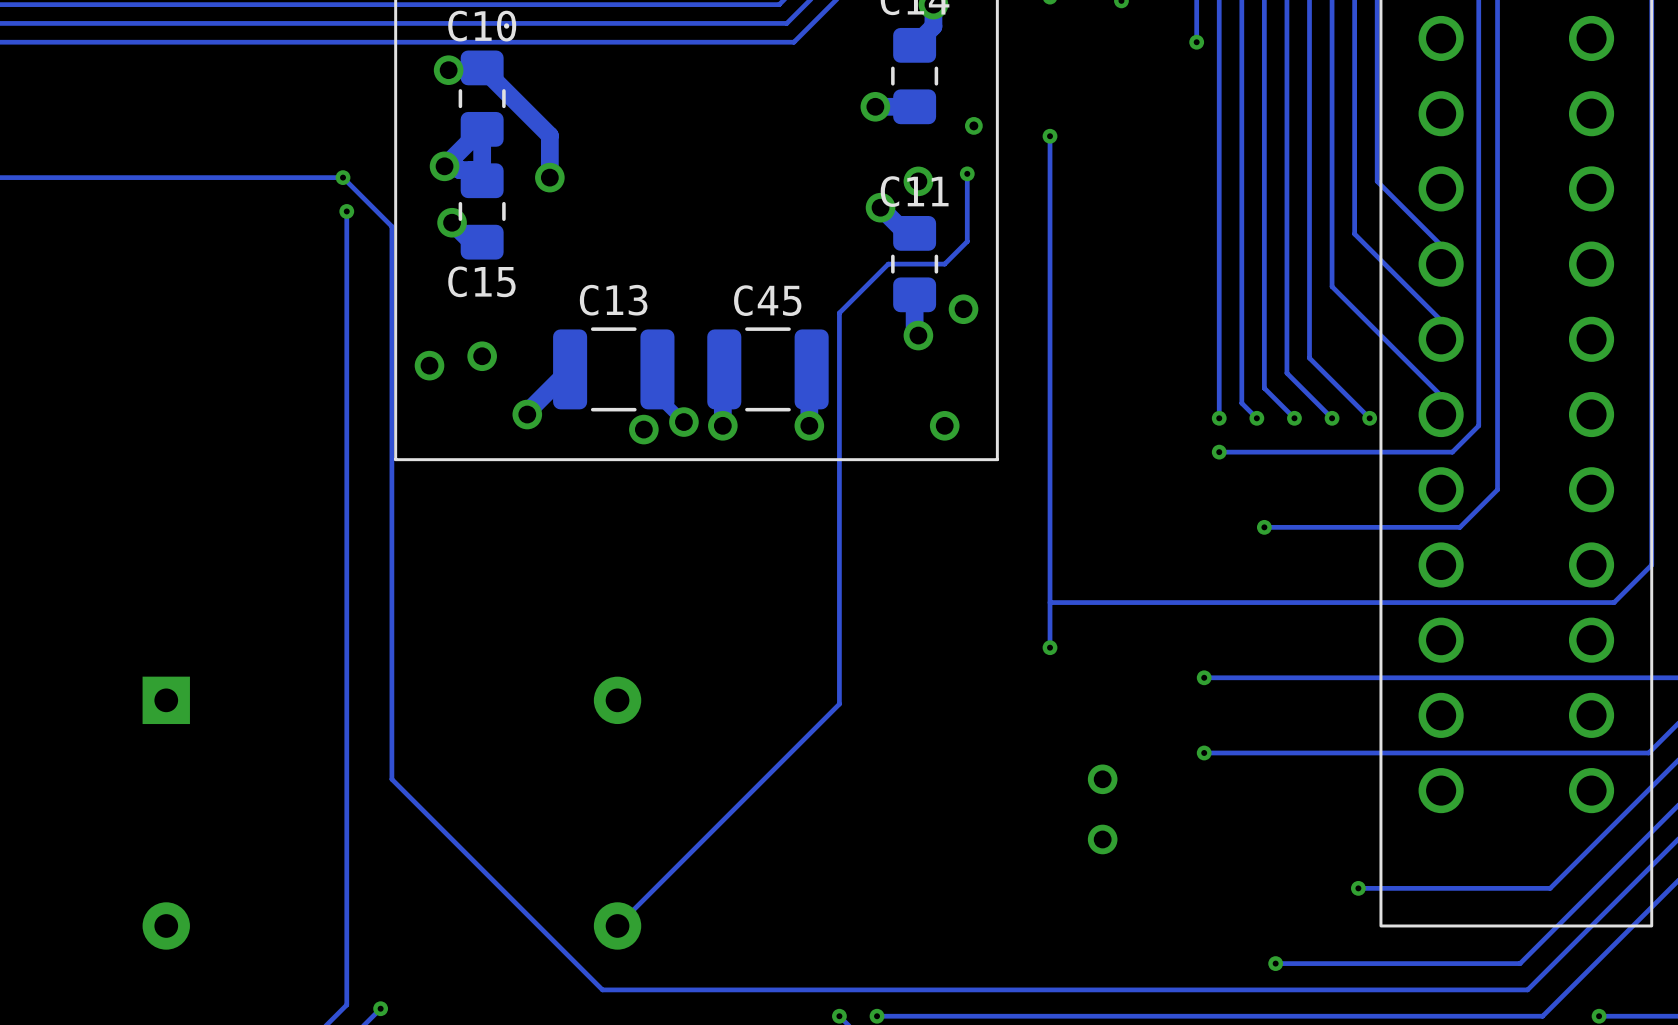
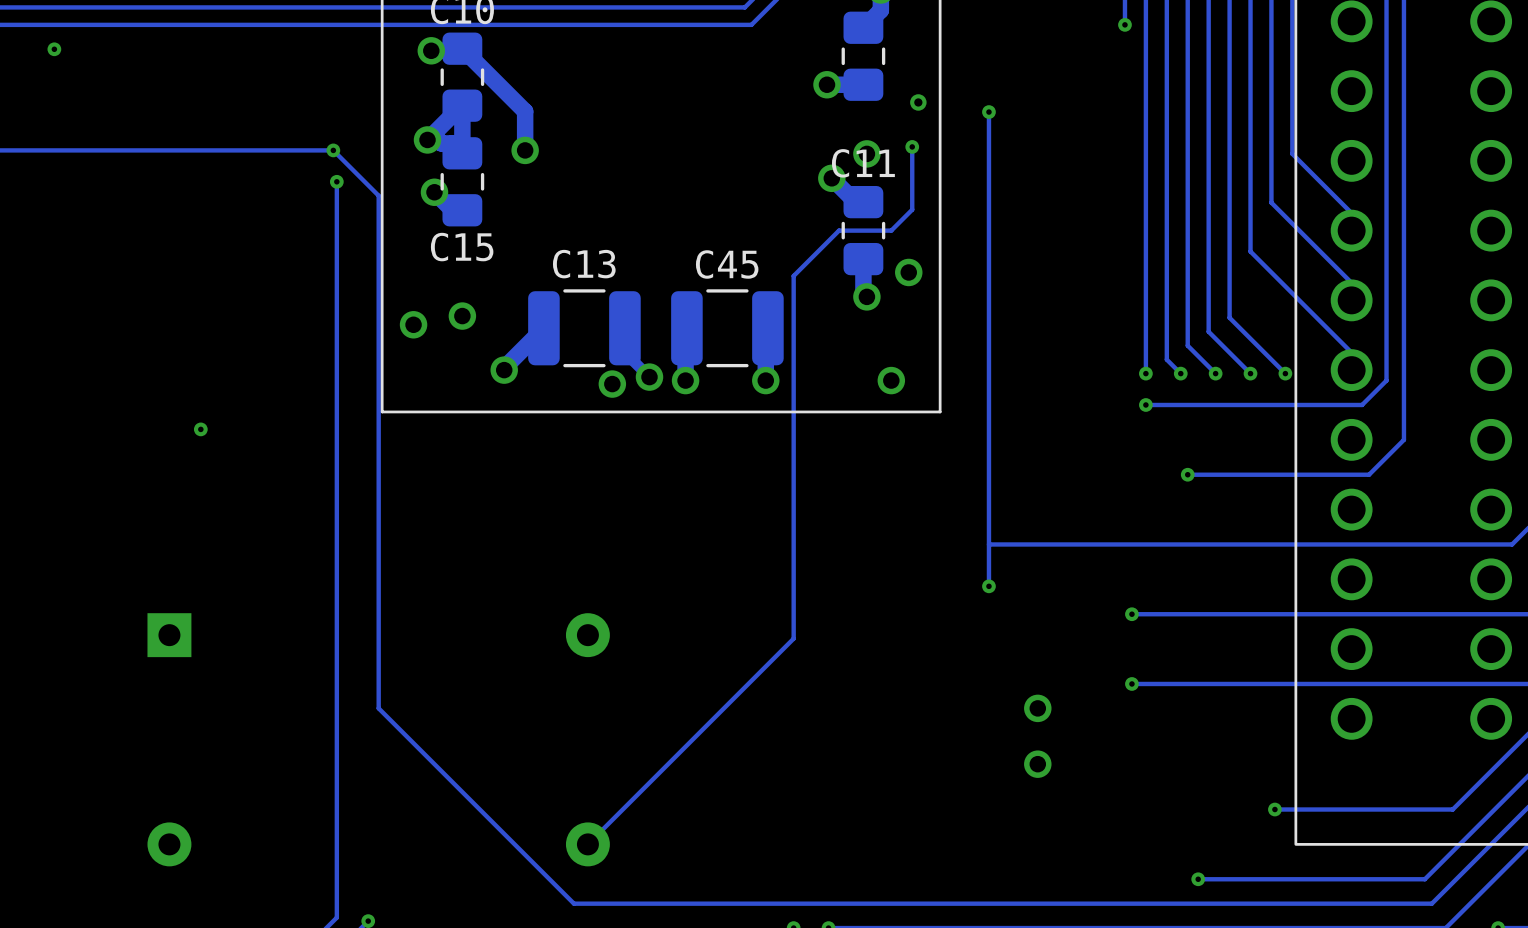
via: none -> (54, 49)
via: none -> (200, 429)

